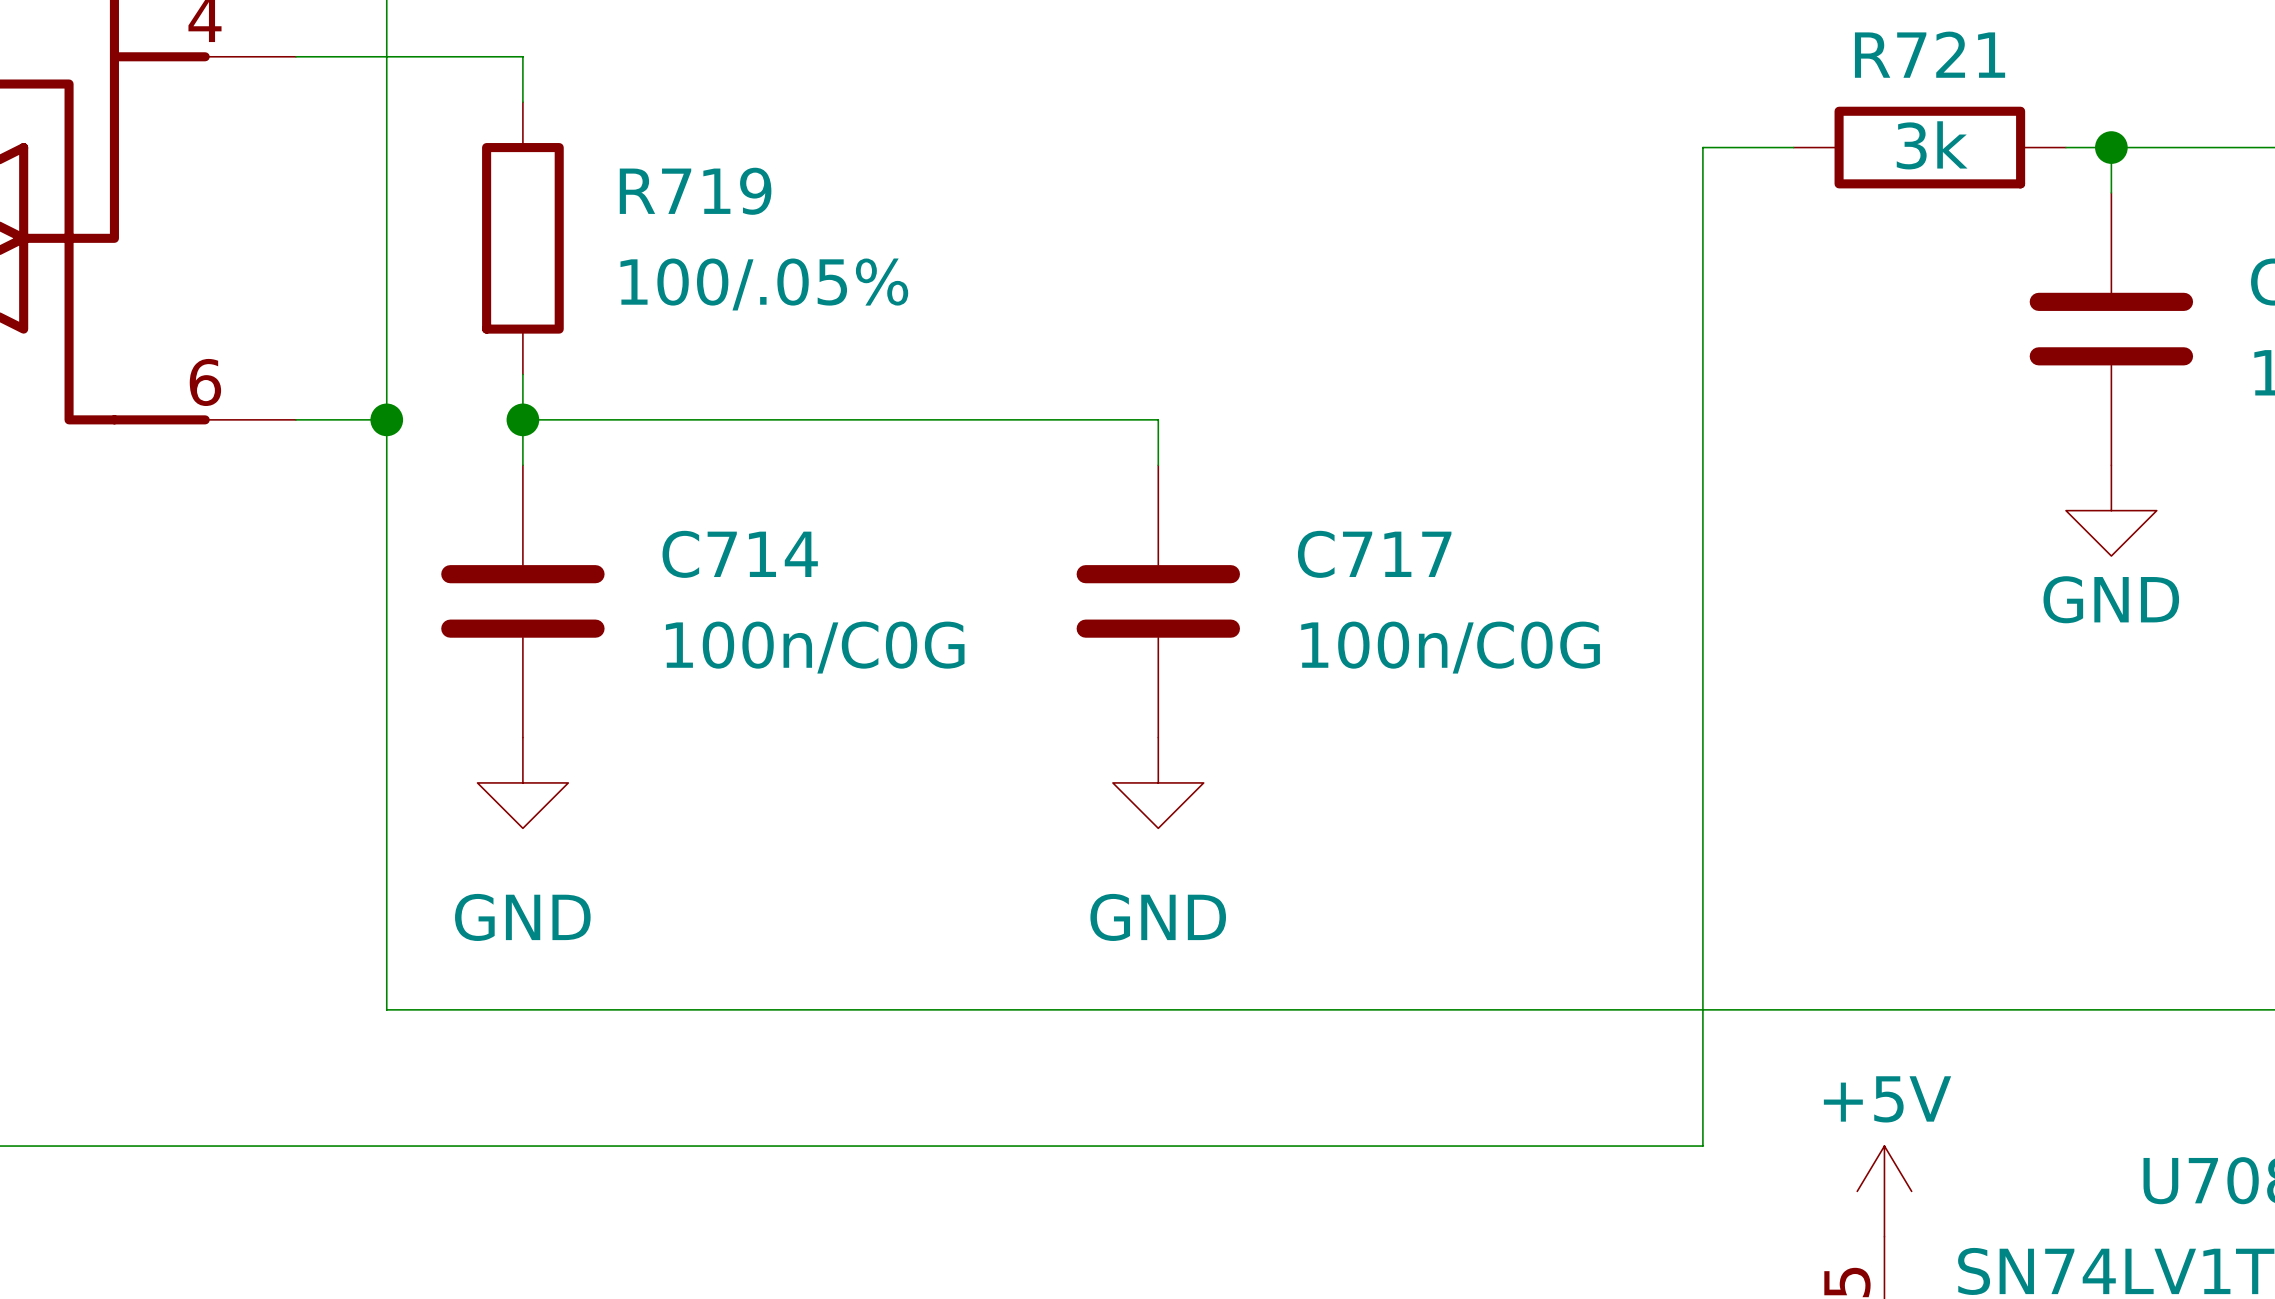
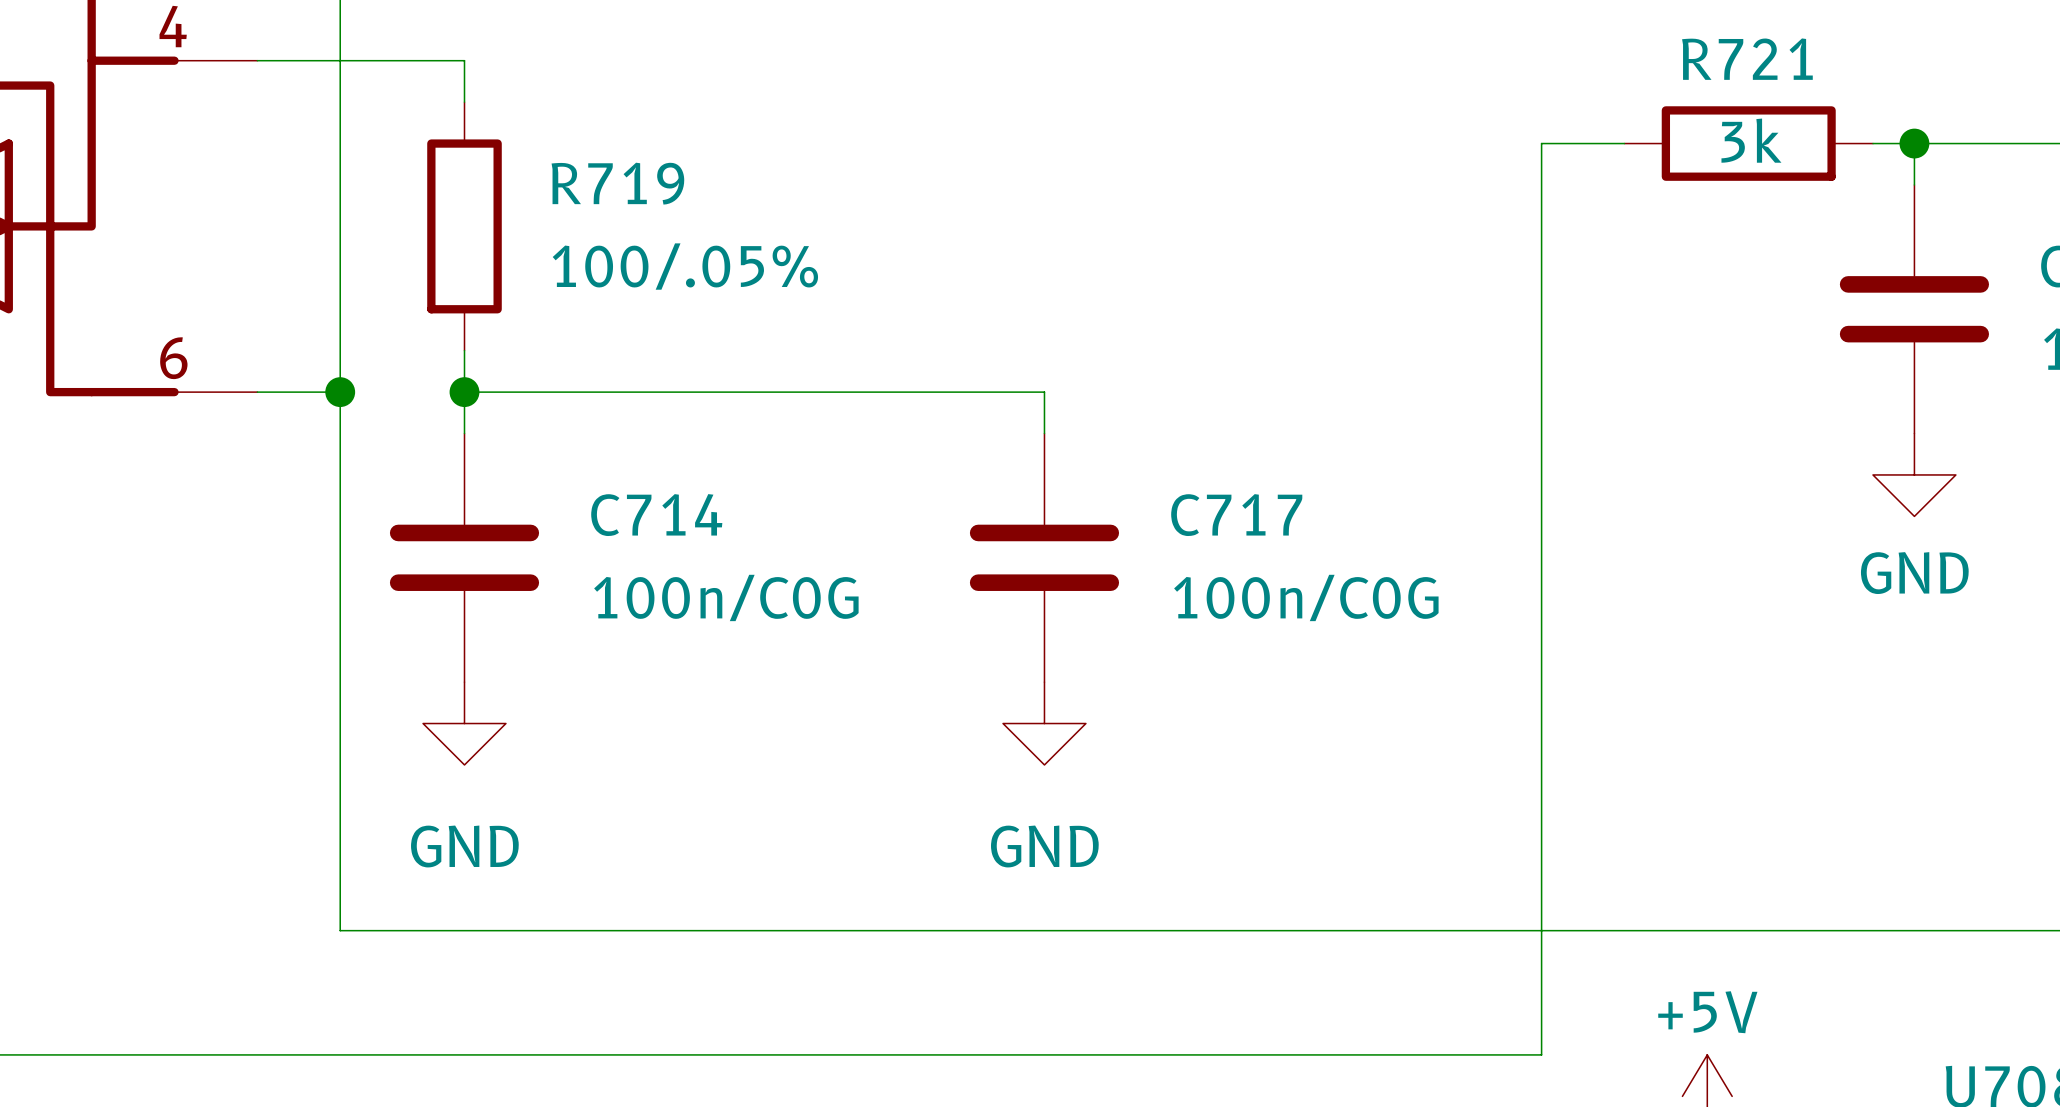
power symbol text position: GND (2111, 599) -> GND (1914, 573)

